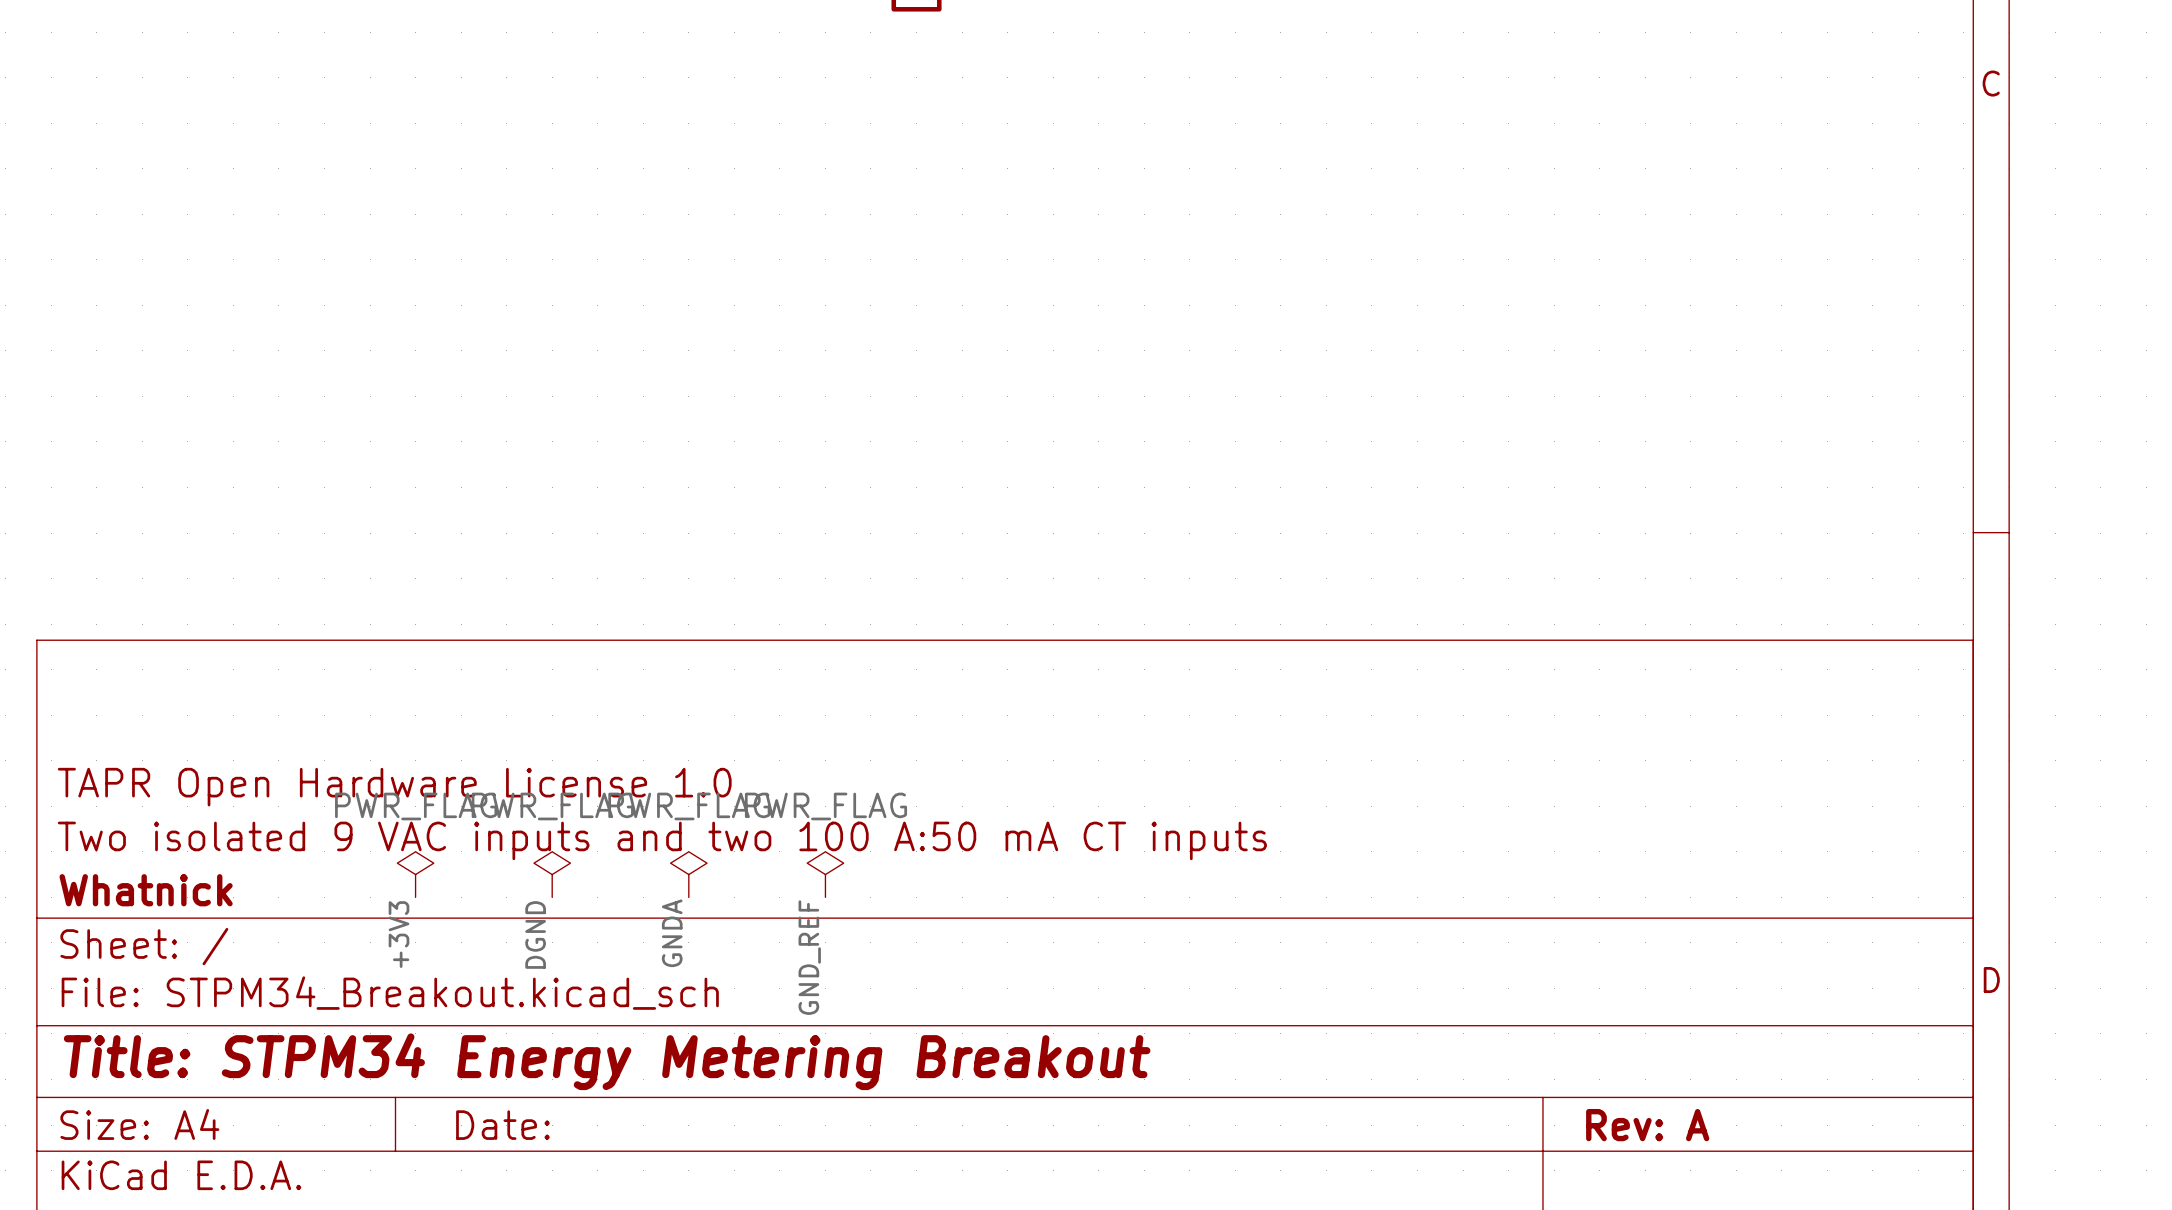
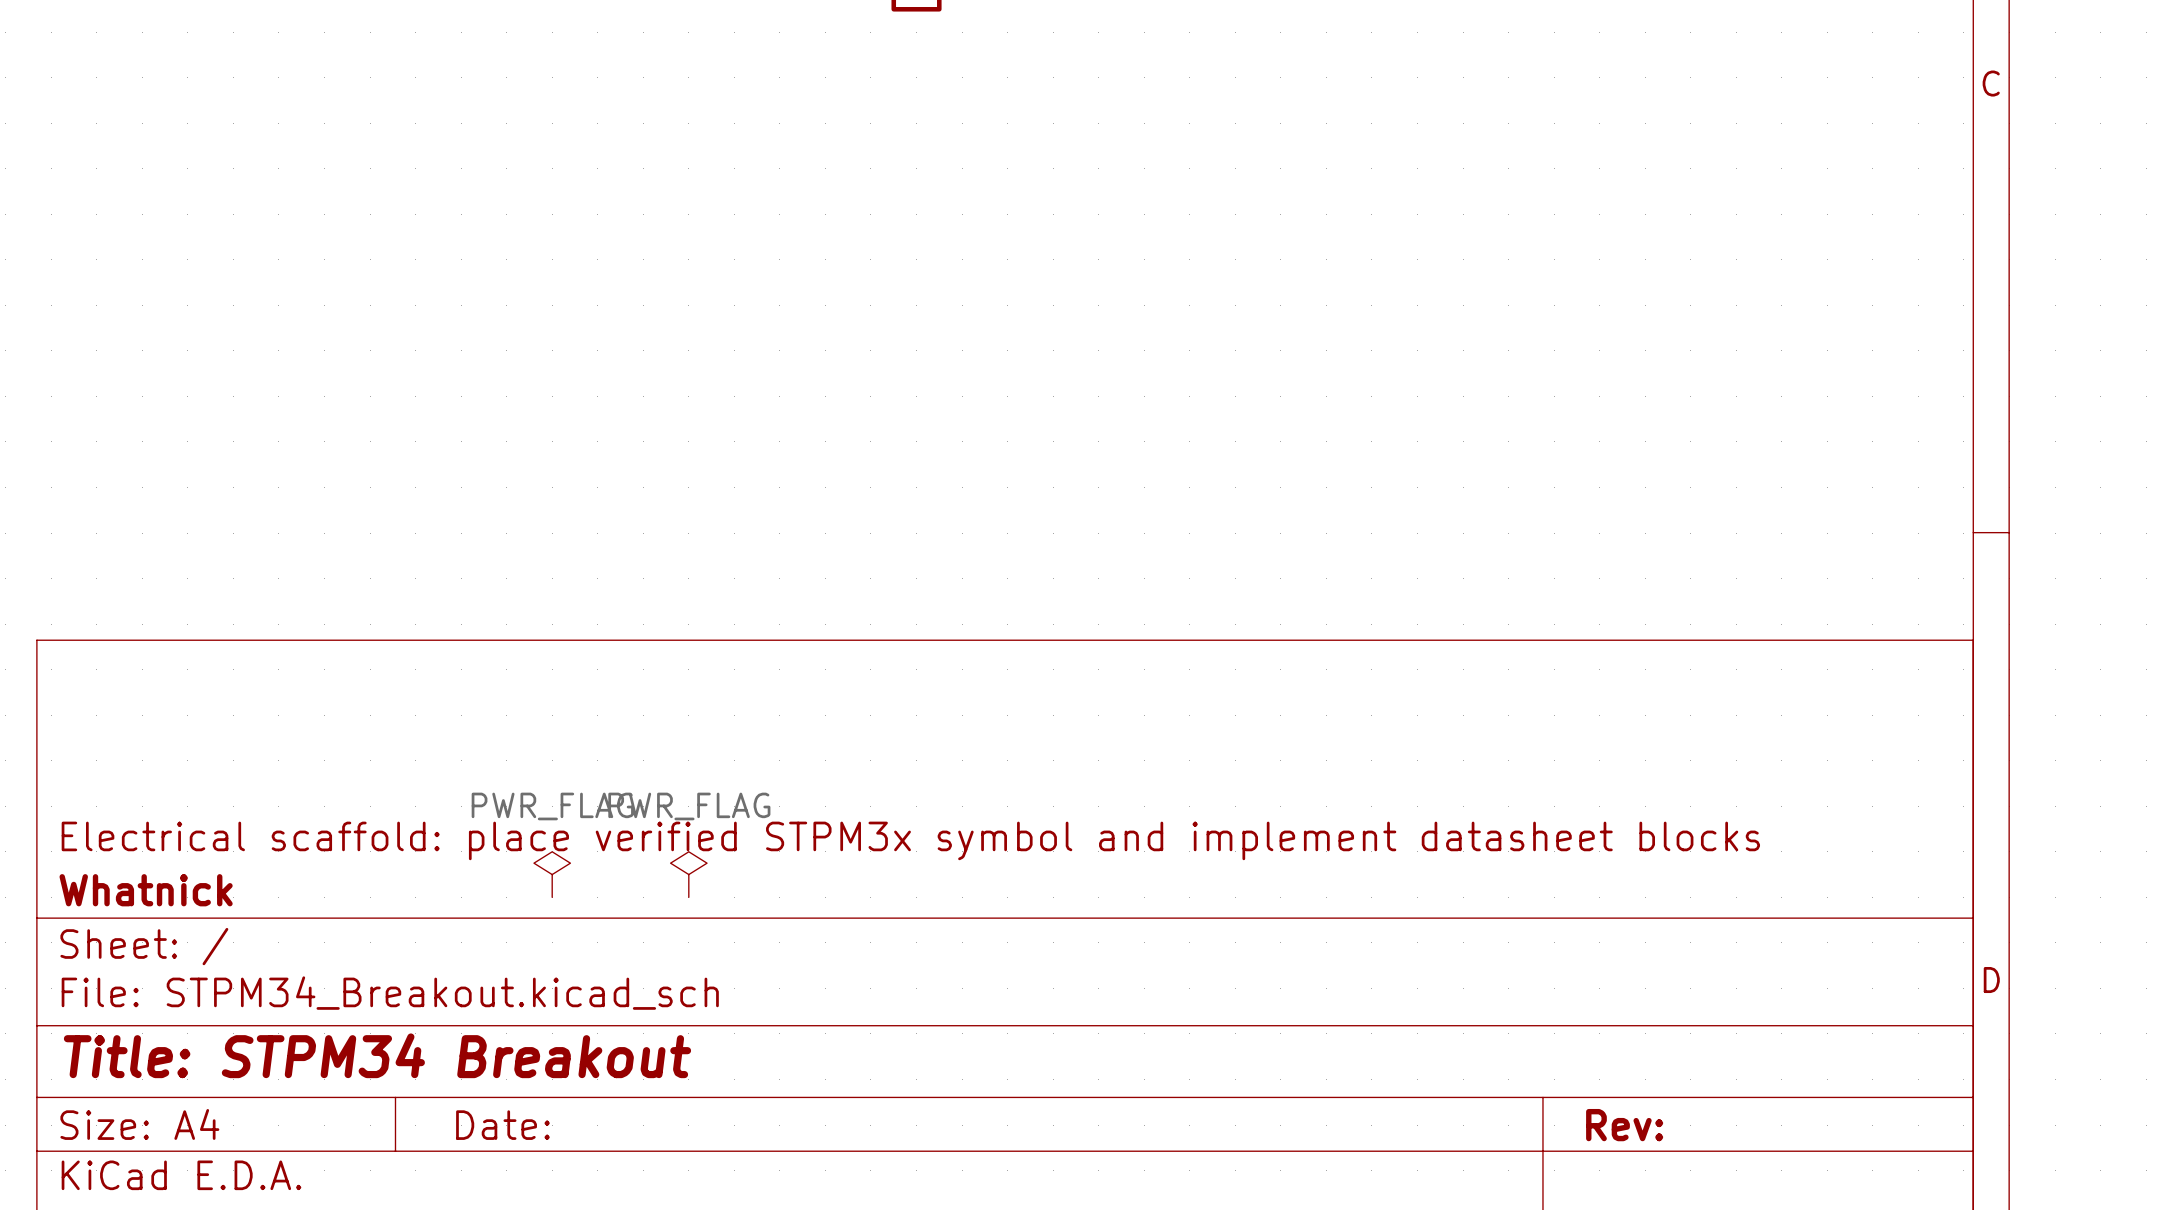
title block: TAPR Open Hardware License 1.0 (394, 787) -> none
title block: Two isolated 9 VAC inputs and two 100 A:50 mA CT inputs (662, 840) -> Electrical scaffold: place verified STPM3x symbol and implement datasheet blocks (910, 840)
power symbol: PWR_FLAG (415, 874) -> none
power symbol: PWR_FLAG (825, 874) -> none
label: GNDA (672, 933) -> none
label: +3V3 (398, 934) -> none
label: DGND (535, 934) -> none
label: GND_REF (809, 957) -> none
title block: Title: STPM34 Energy Metering Breakout (607, 1061) -> Title: STPM34 Breakout (377, 1055)
title block: Rev: A (1647, 1125) -> Rev: (1624, 1125)

